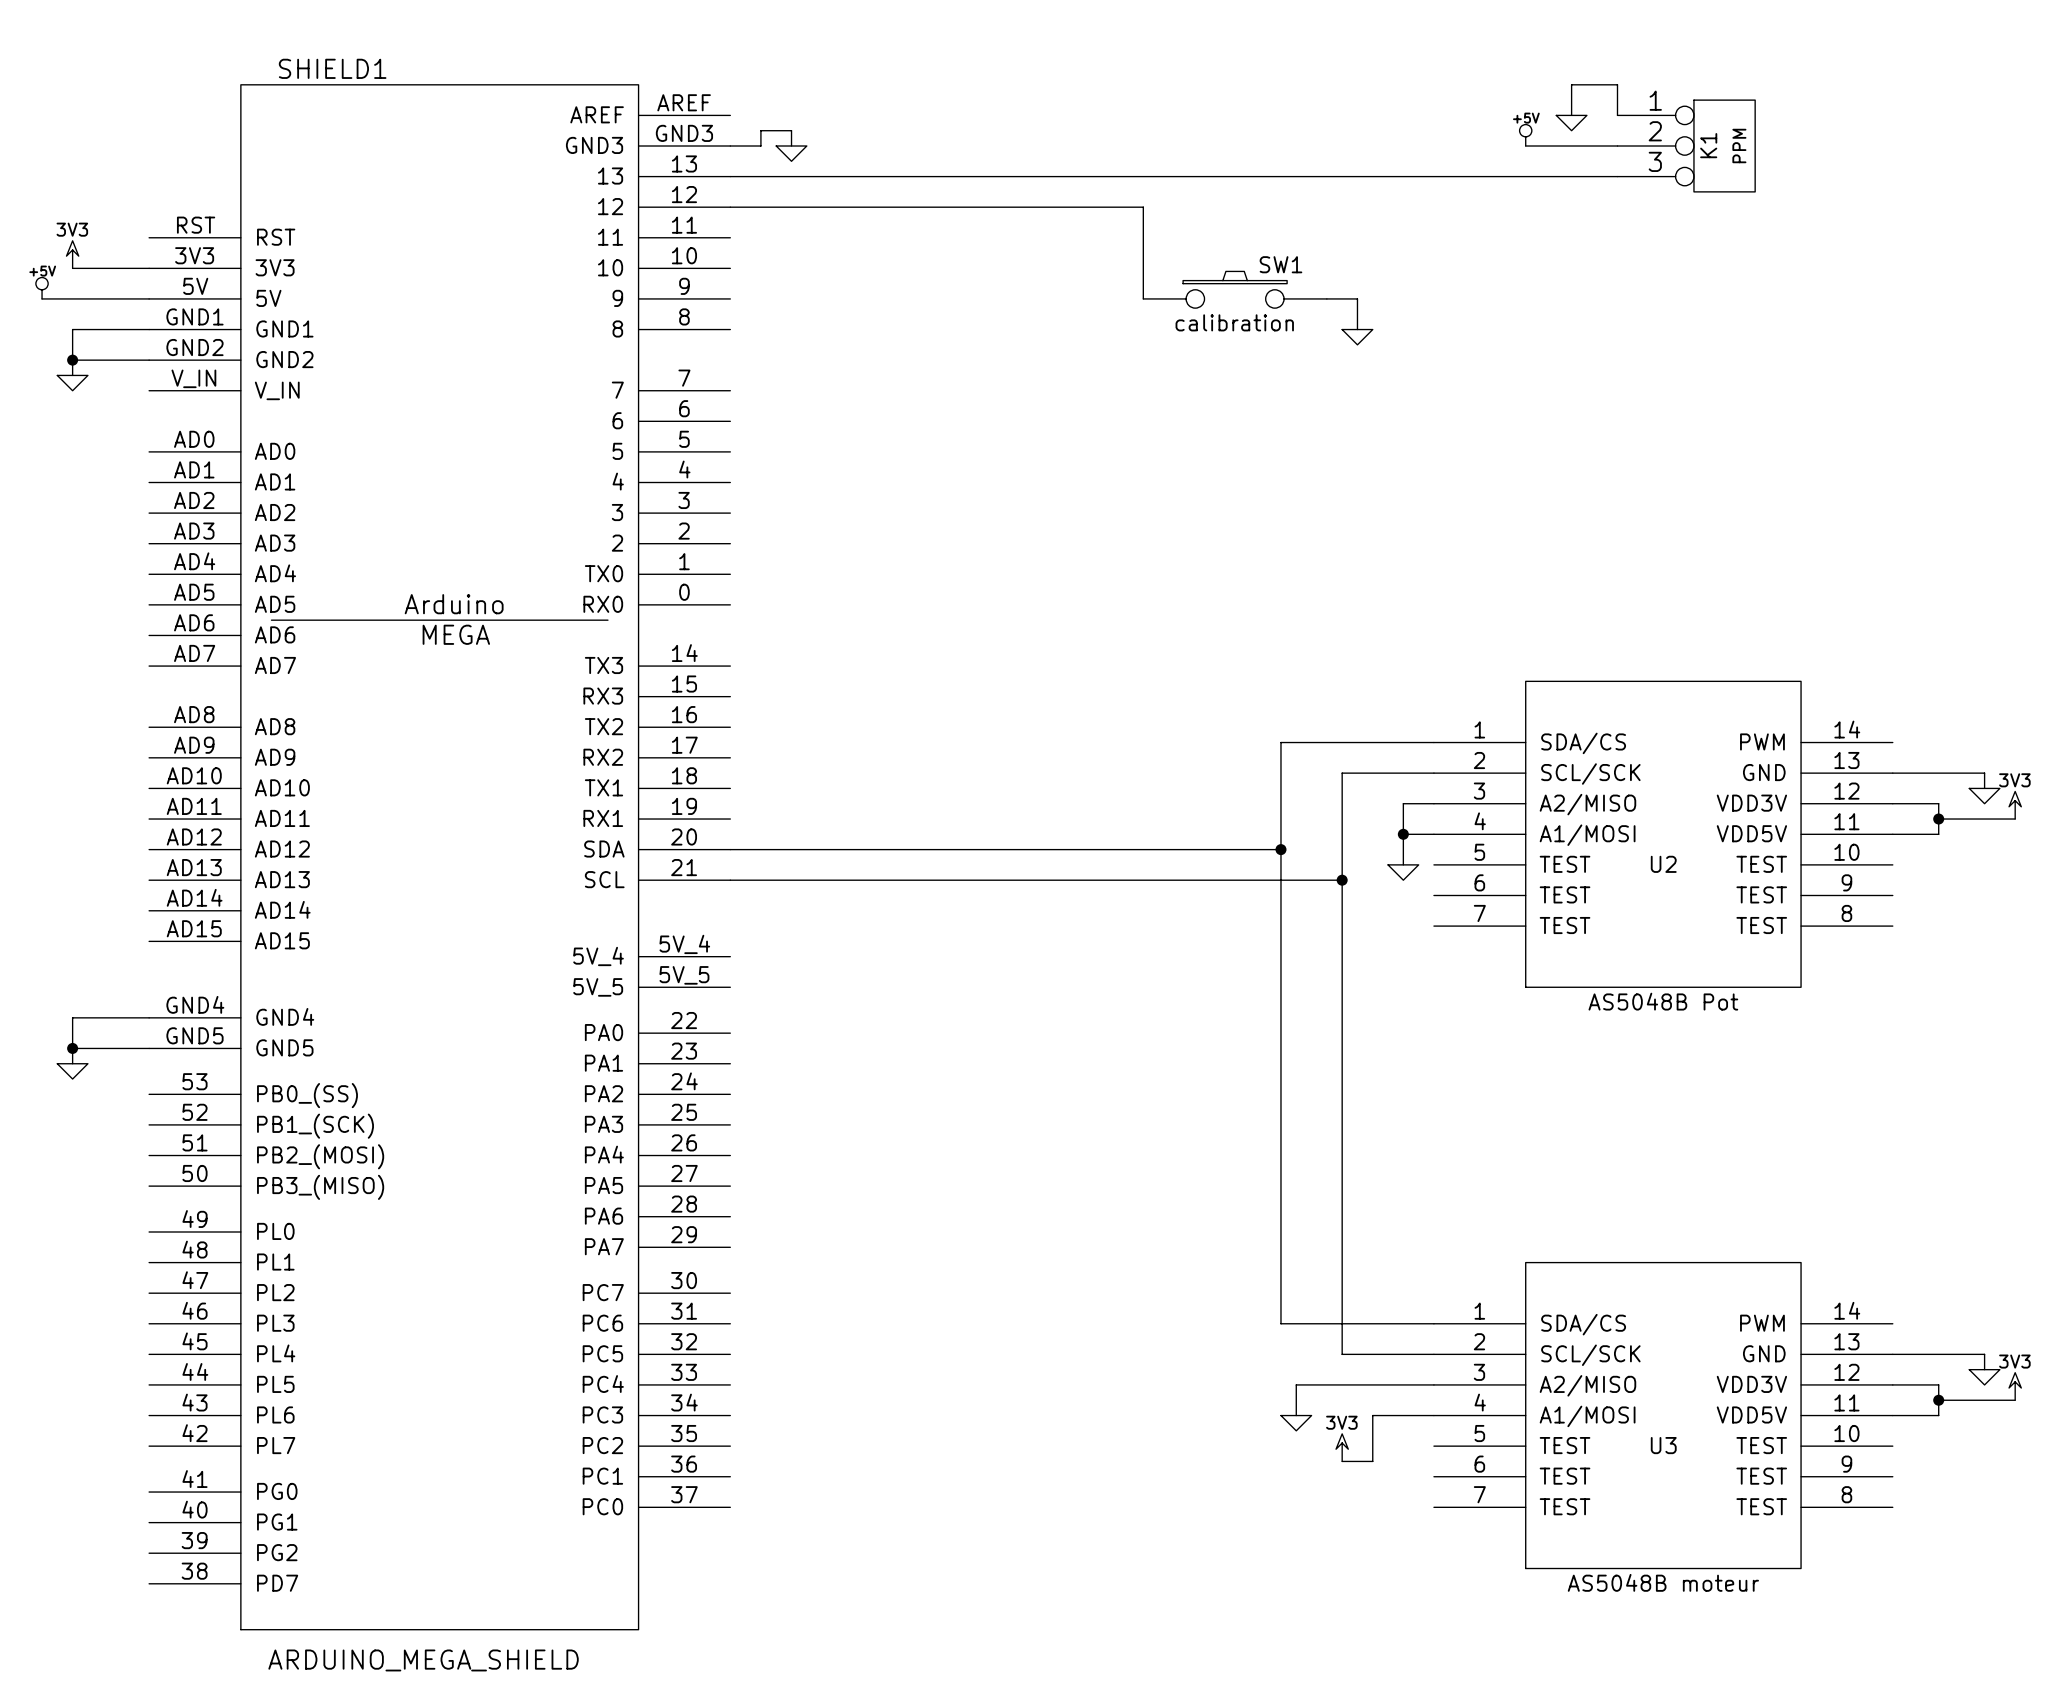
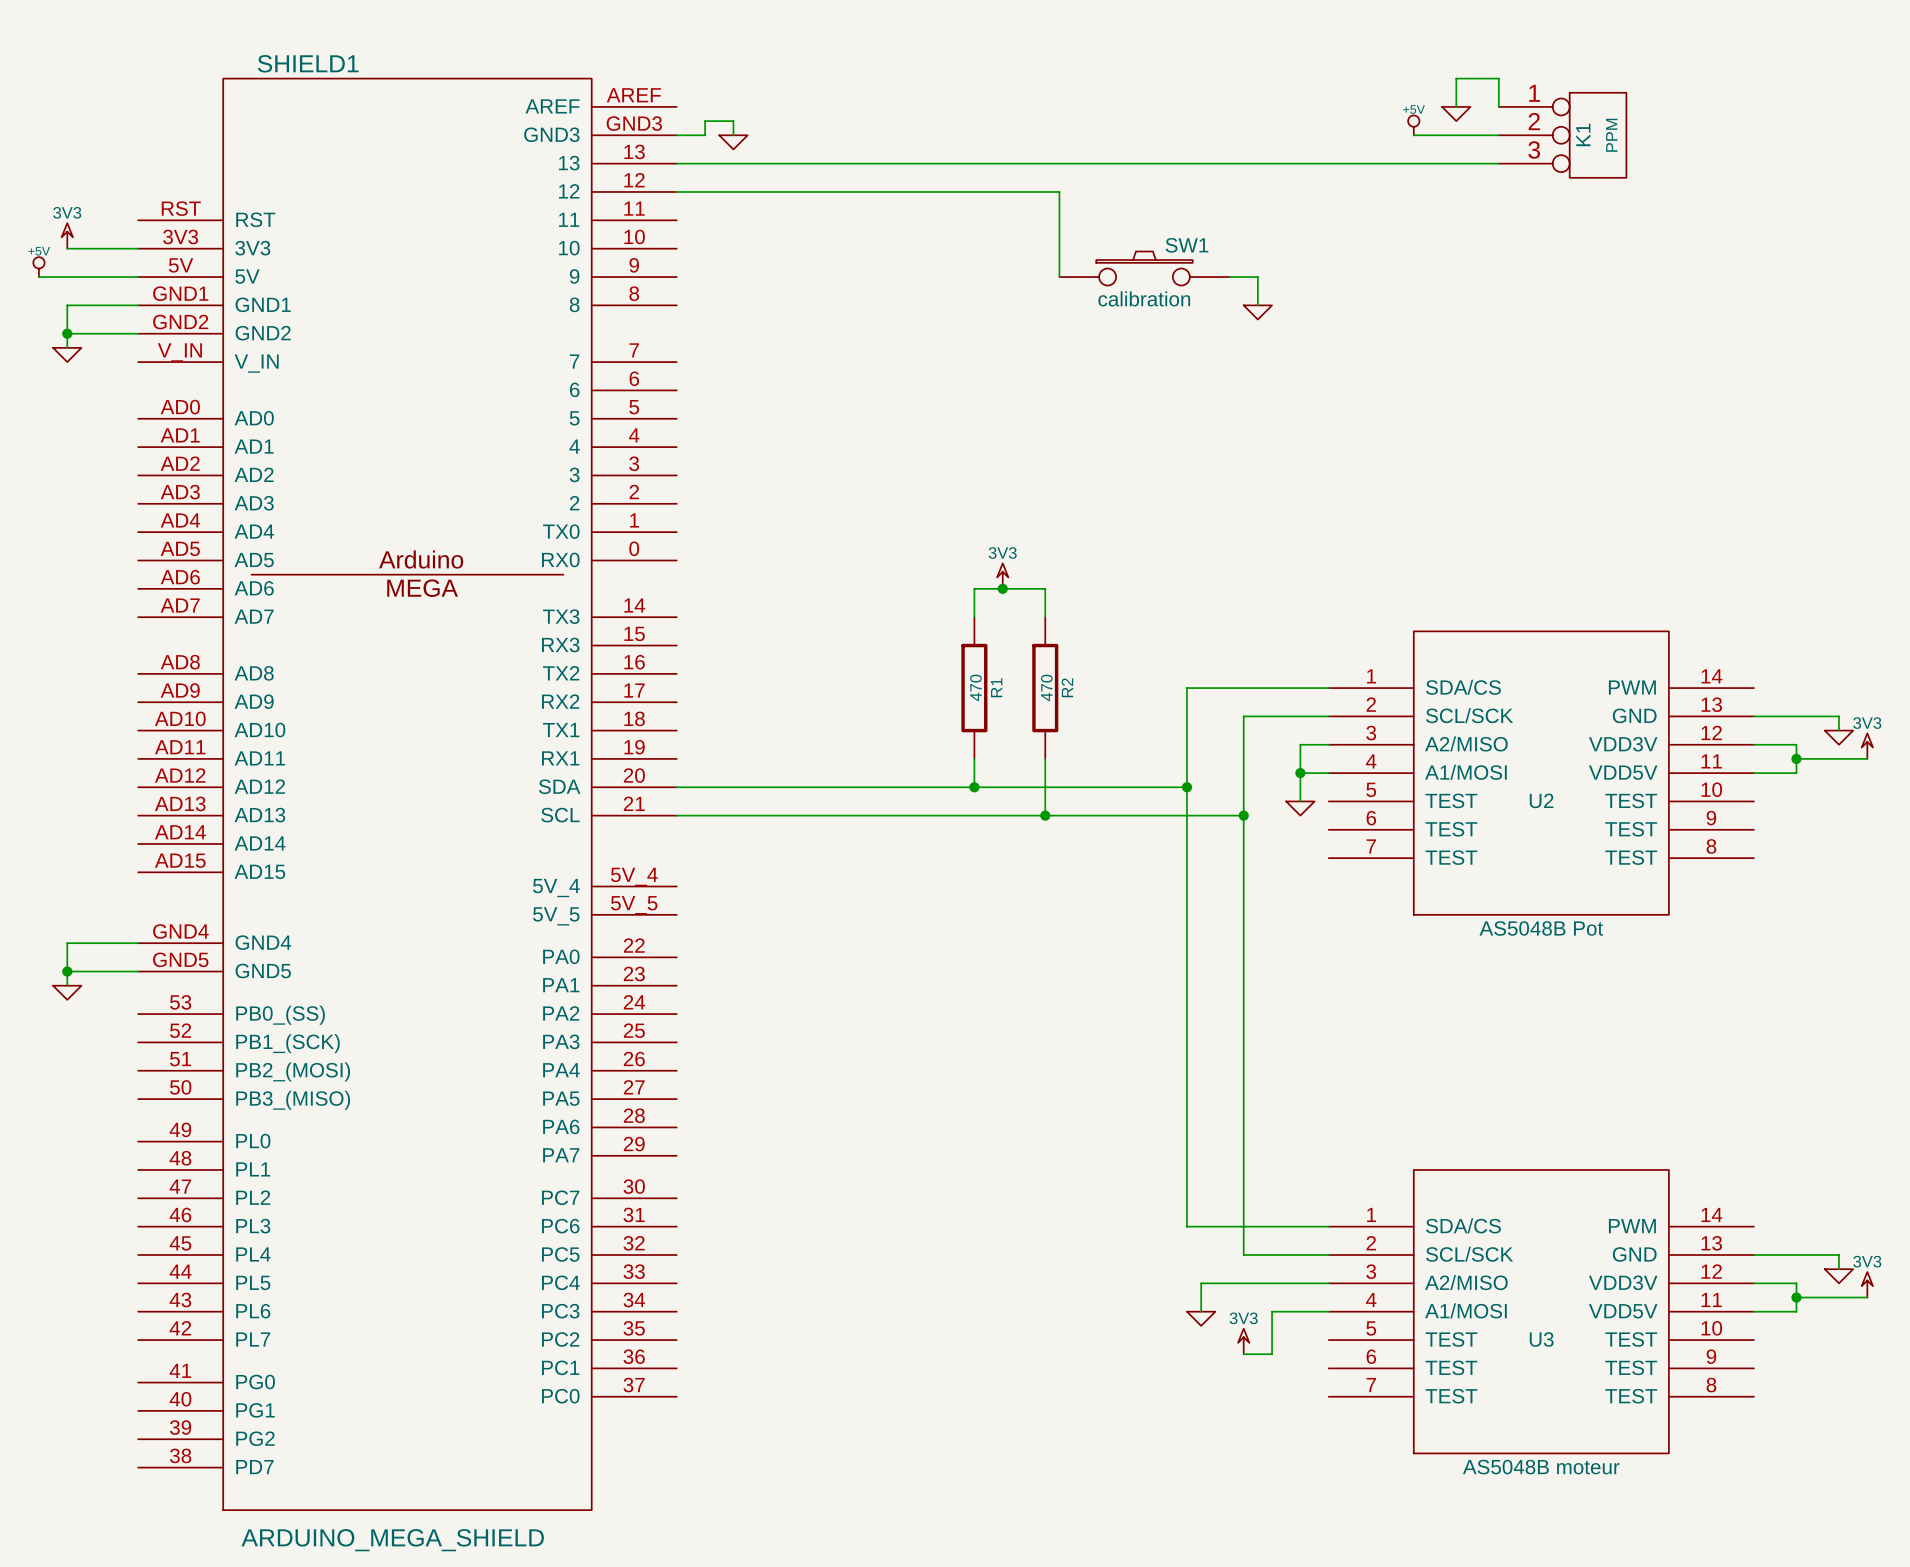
power symbol: none -> 3V3 (1002, 576)
junction: none -> (1002, 588)
wire: none -> (974, 617) (974, 588) (1045, 588) (1045, 617)
R1: none -> 470 (974, 688)
R2: none -> 470 (1045, 688)
wire: none -> (974, 758) (974, 787)
wire: none -> (1045, 758) (1045, 815)
junction: none -> (974, 787)
junction: none -> (1045, 815)

